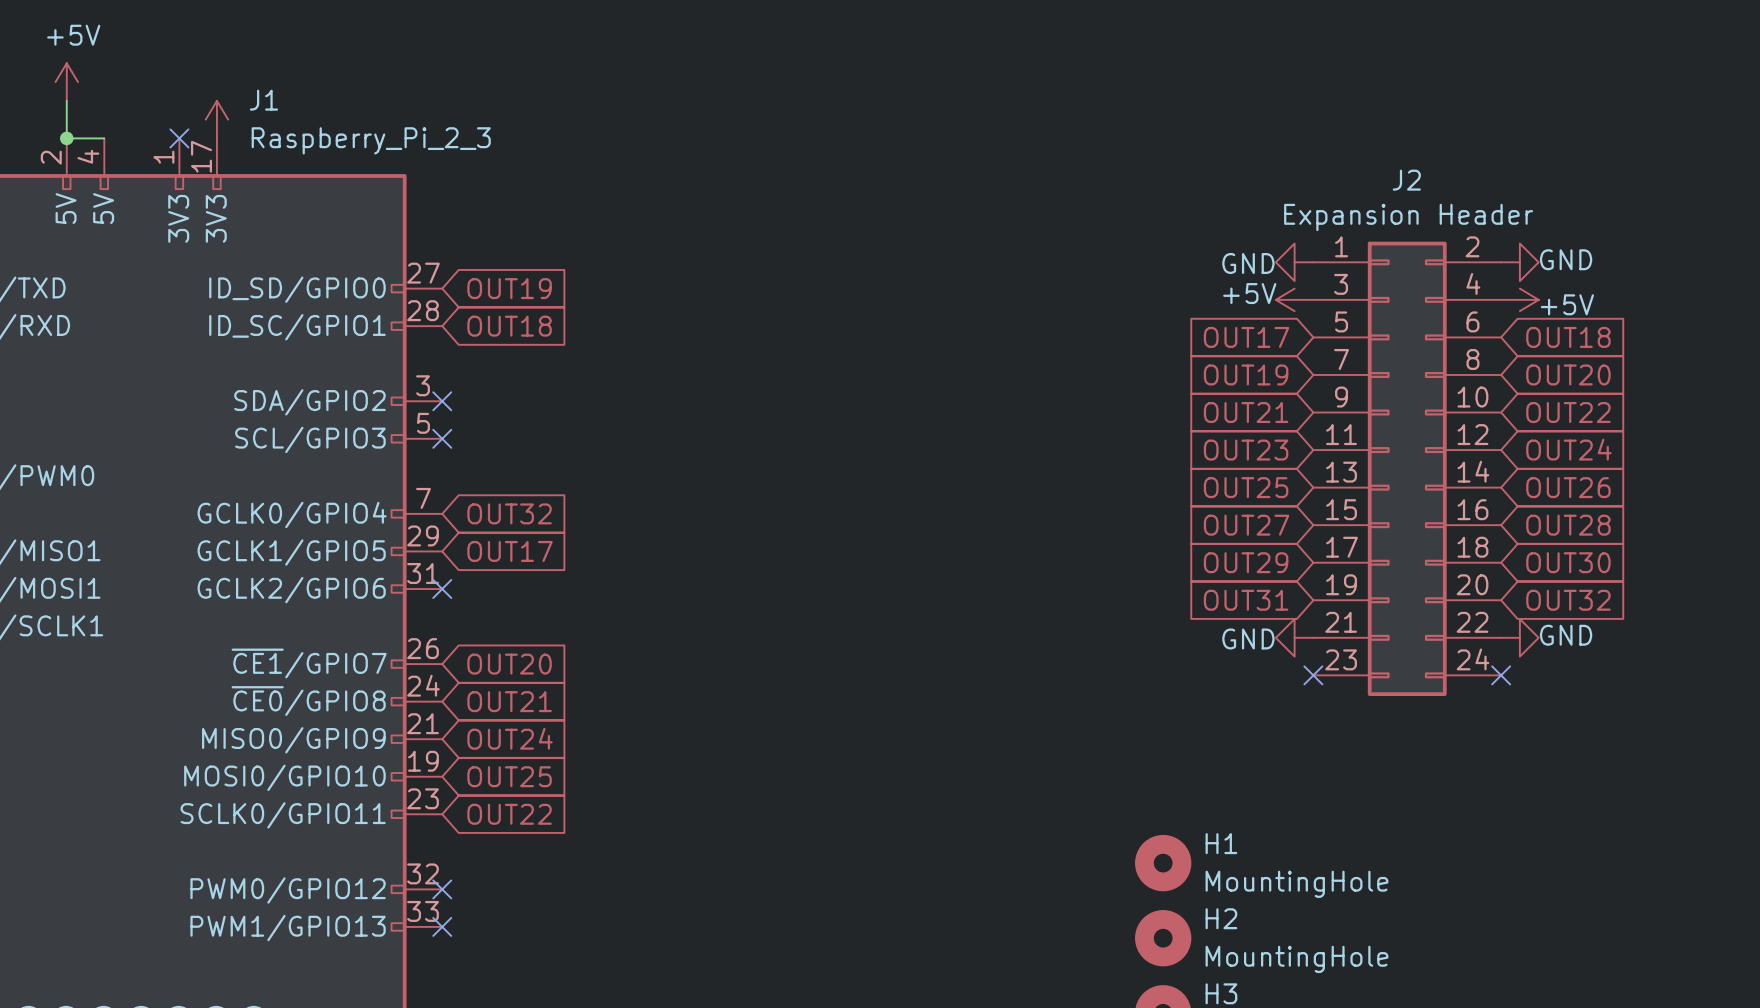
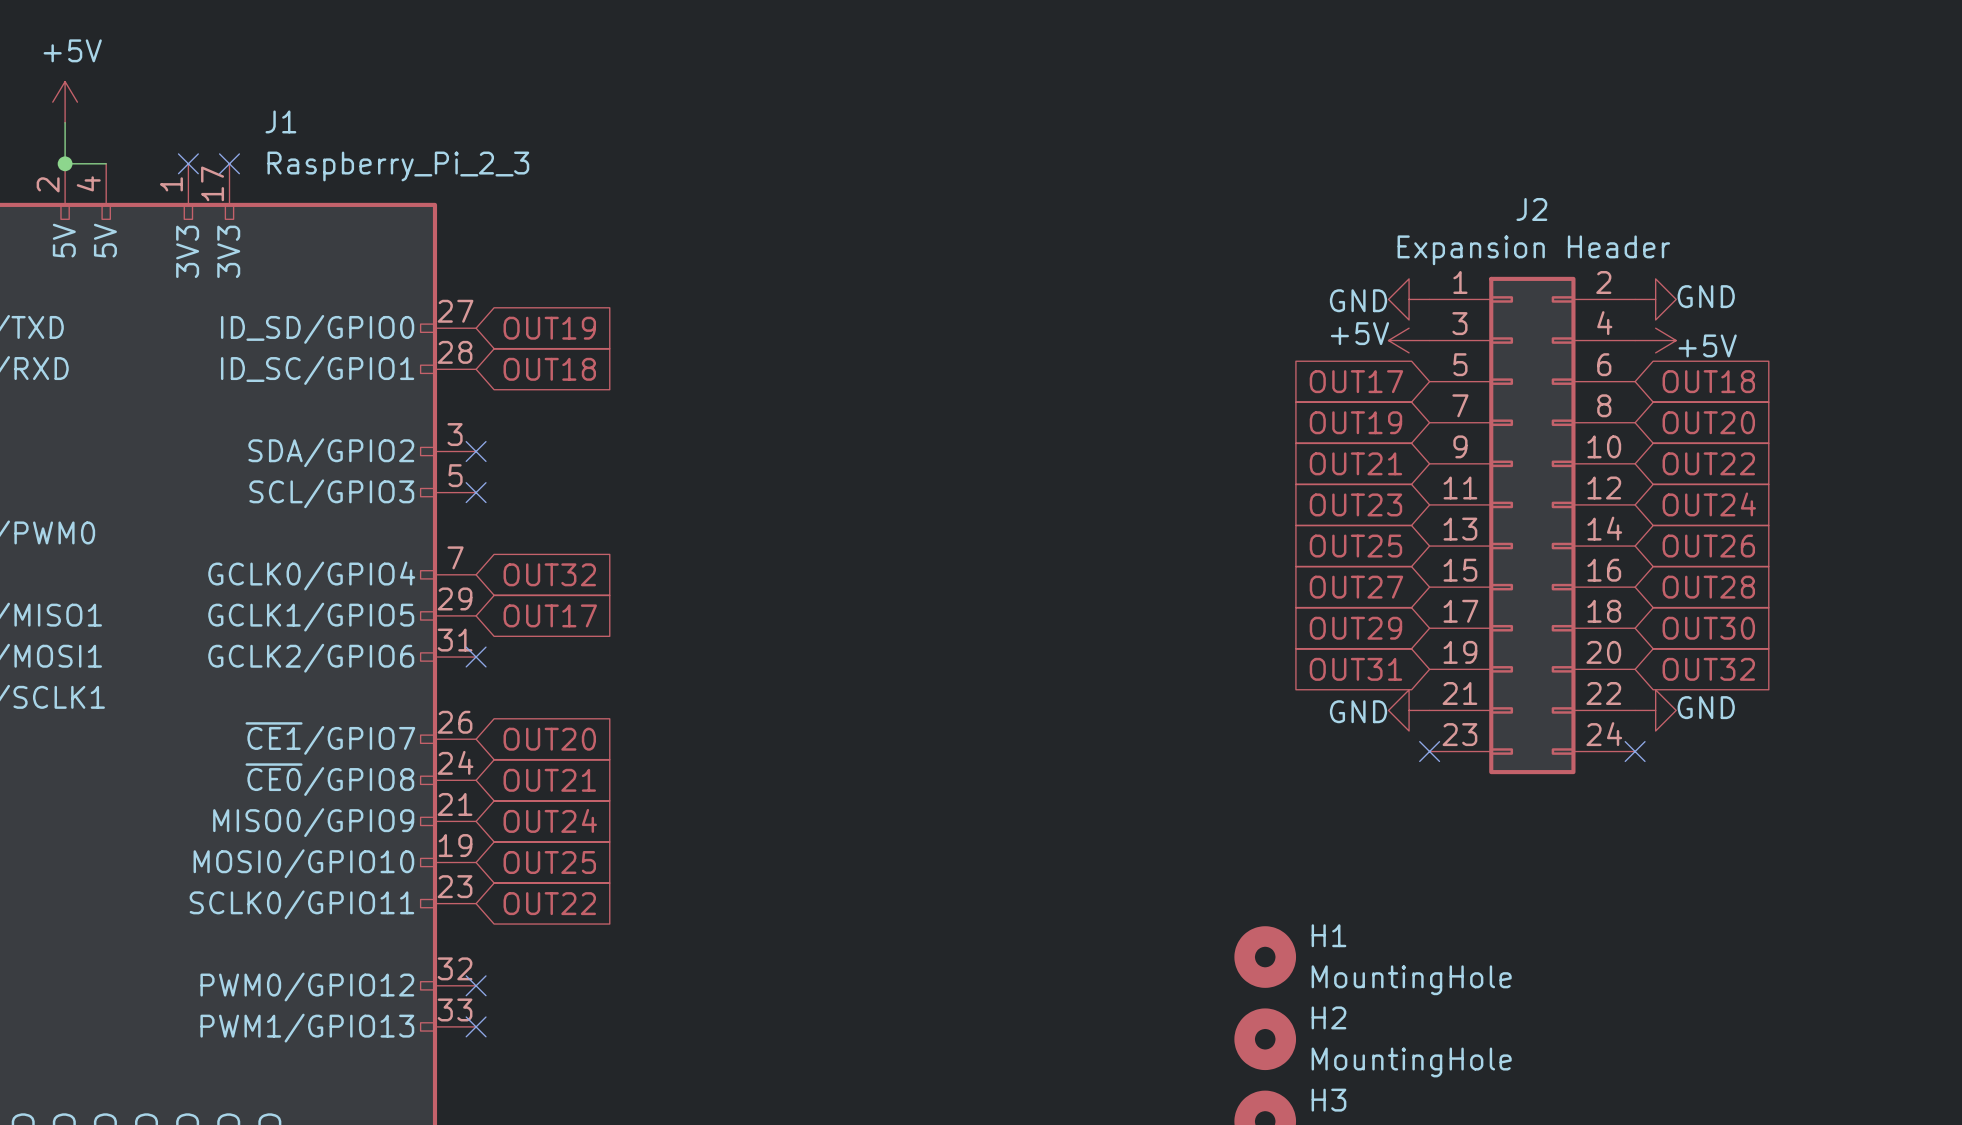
power symbol: (216, 119) -> none
no-connect mark: none -> (229, 163)

